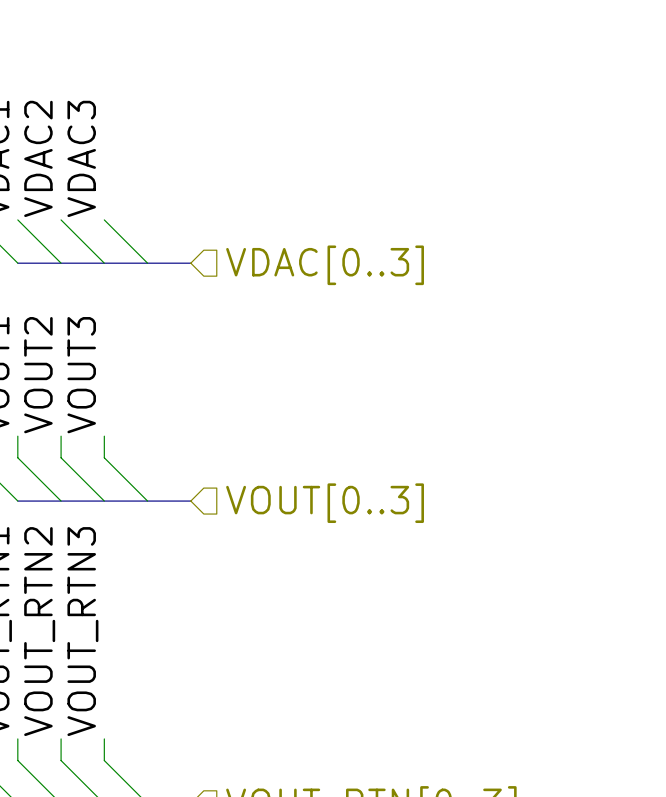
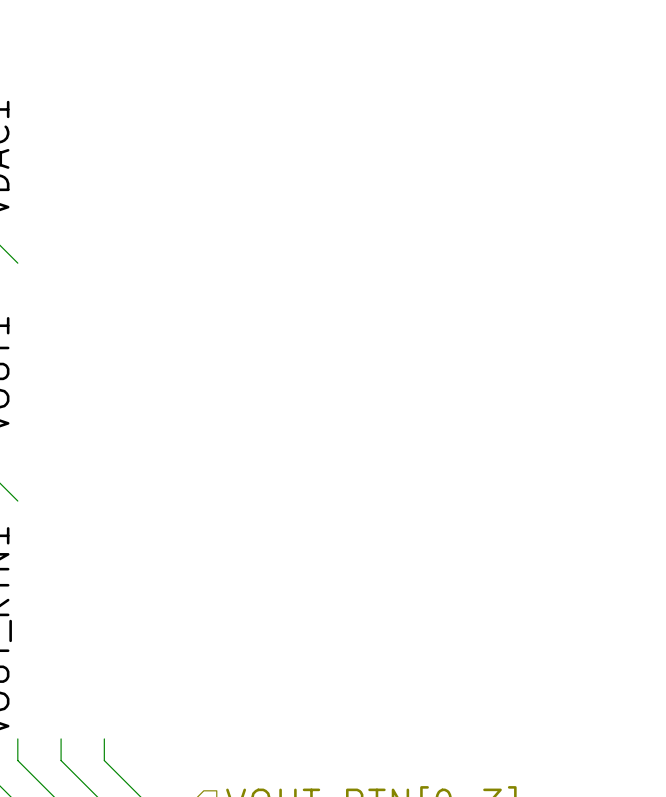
label: VDAC2 (38, 158) -> none
label: VDAC3 (81, 158) -> none
wire: (17, 219) (61, 263) -> none
wire: (61, 219) (104, 263) -> none
wire: (104, 219) (147, 263) -> none
bus: (17, 263) (190, 263) -> none
hierarchical label: VDAC[0..3] (325, 265) -> none
label: VOUT2 (38, 375) -> none
label: VOUT3 (81, 375) -> none
wire: (17, 436) (17, 457) (61, 501) -> none
wire: (61, 436) (61, 457) (104, 501) -> none
wire: (104, 436) (104, 457) (147, 501) -> none
bus: (17, 501) (190, 501) -> none
hierarchical label: VOUT[0..3] (325, 503) -> none
label: VOUT_RTN2 (39, 631) -> none
label: VOUT_RTN3 (82, 631) -> none

